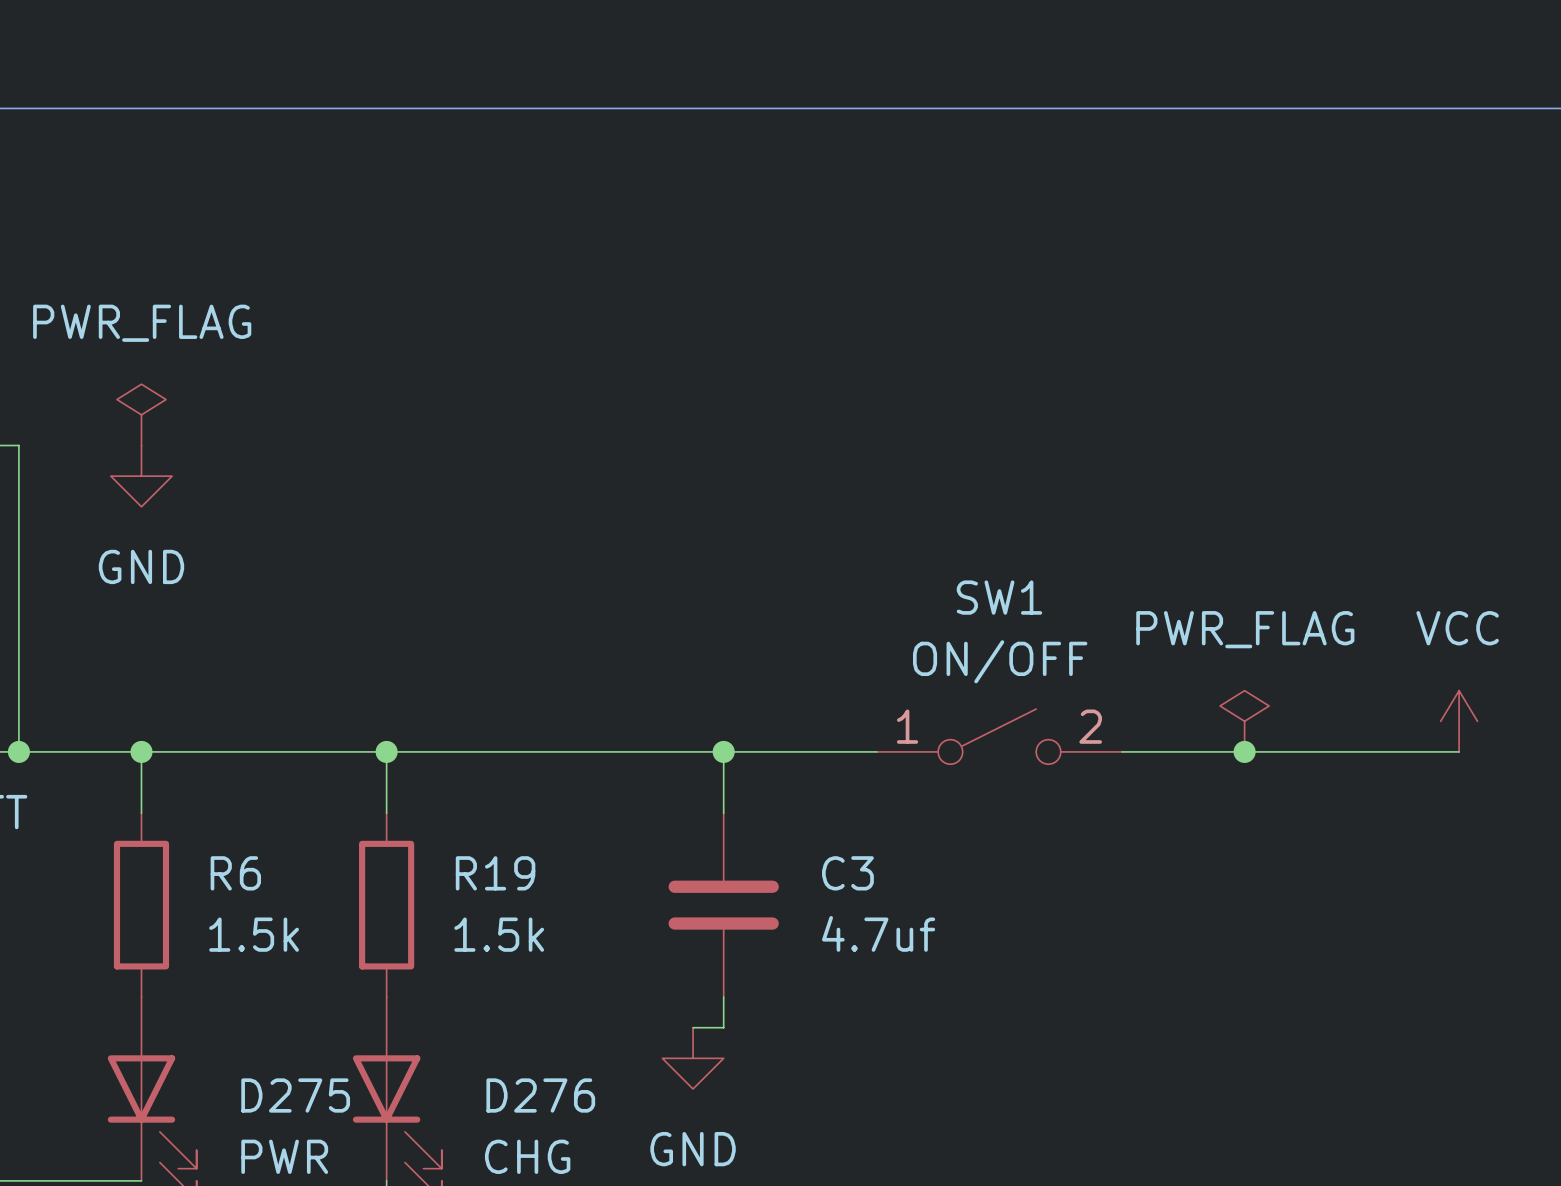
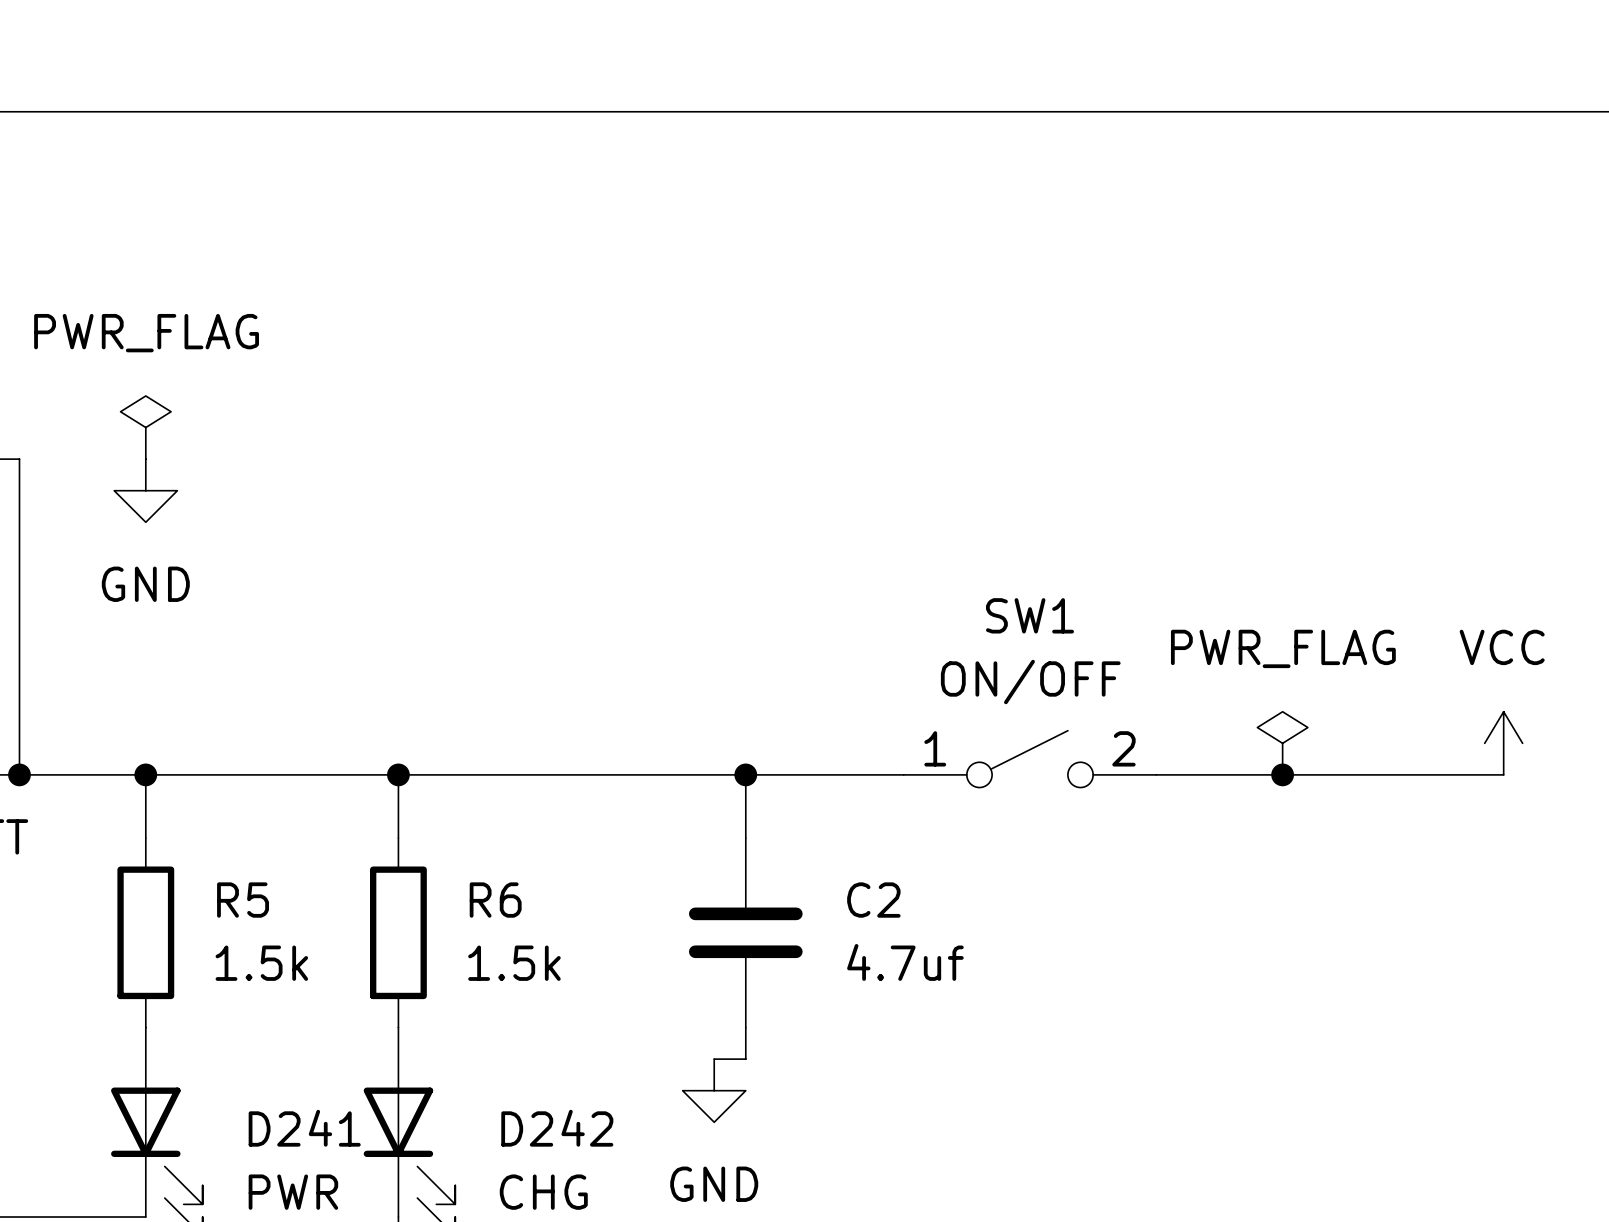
R6 name: R6 (235, 873) -> R5 (243, 900)
R19 name: R19 (495, 873) -> R6 (495, 900)
C3 name: C3 (847, 873) -> C2 (873, 900)
D275 name: D275 (295, 1095) -> D241 (304, 1128)
D276 name: D276 (540, 1095) -> D242 (557, 1128)

